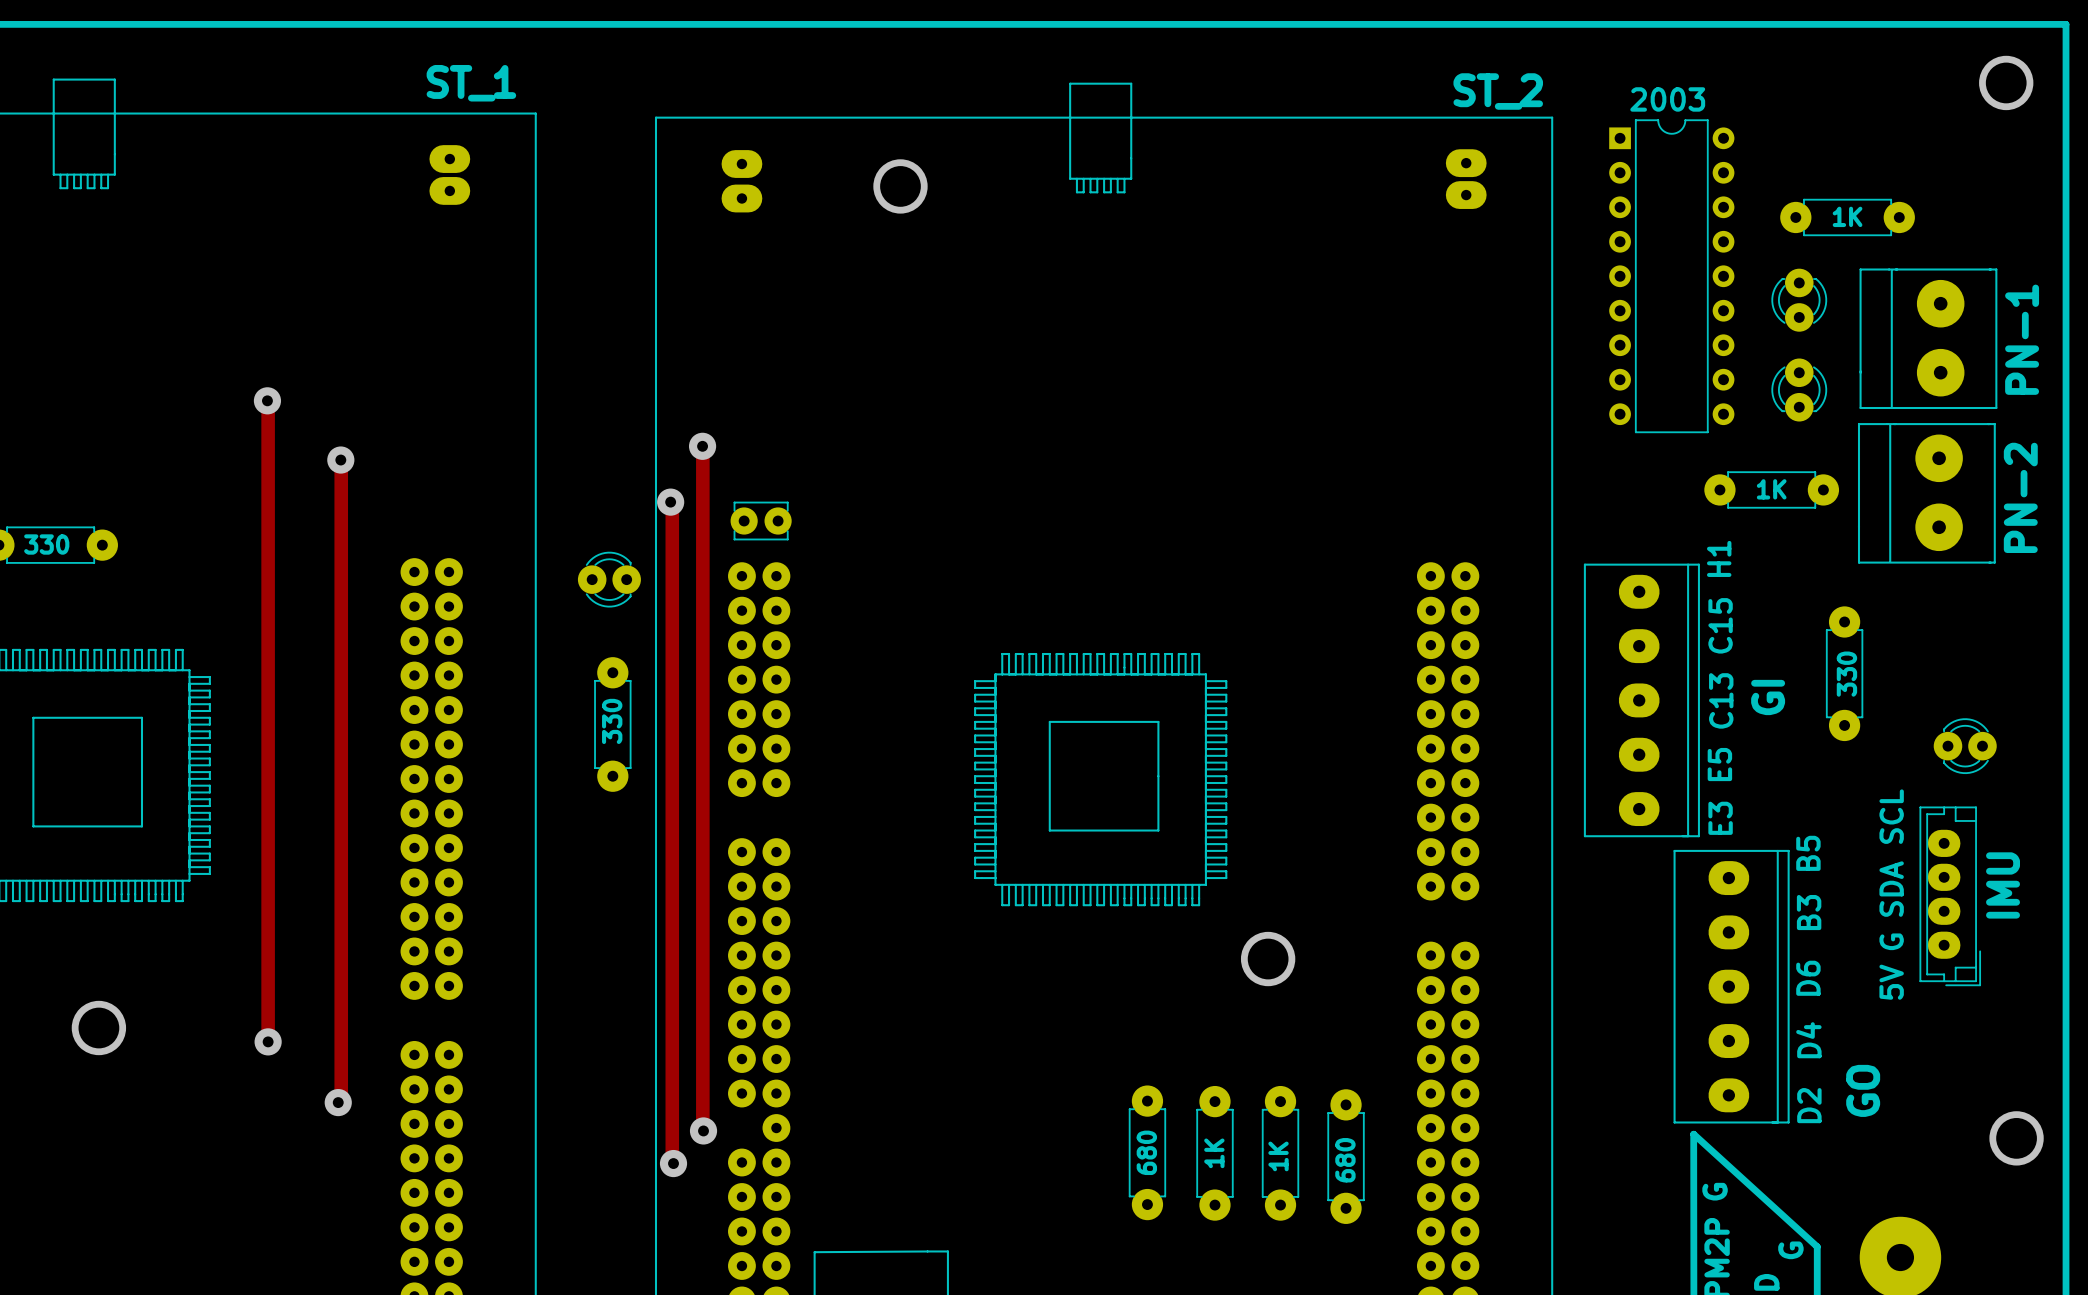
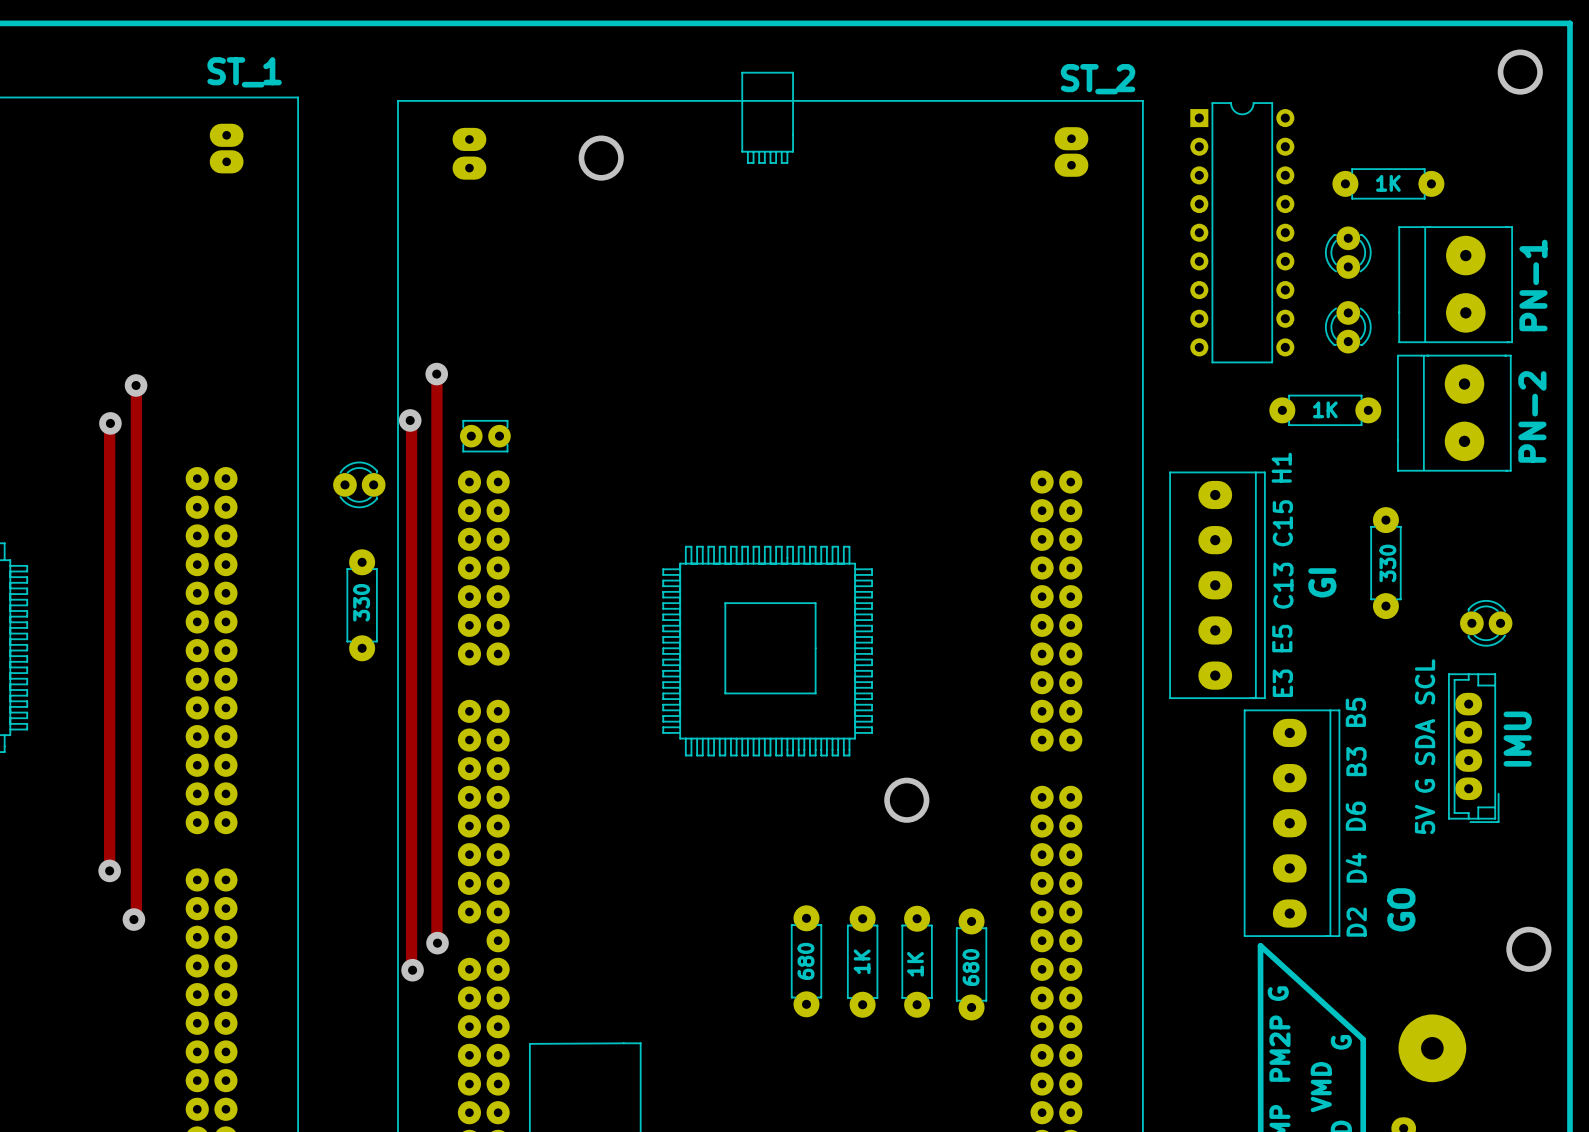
text: 2003 (1667, 99) -> none
track: (267, 400) (268, 1041) -> none
via: (267, 400) -> none
track: none -> (110, 423) (109, 870) (108, 869)
via: none -> (110, 423)
via position: (268, 1041) -> (109, 870)

